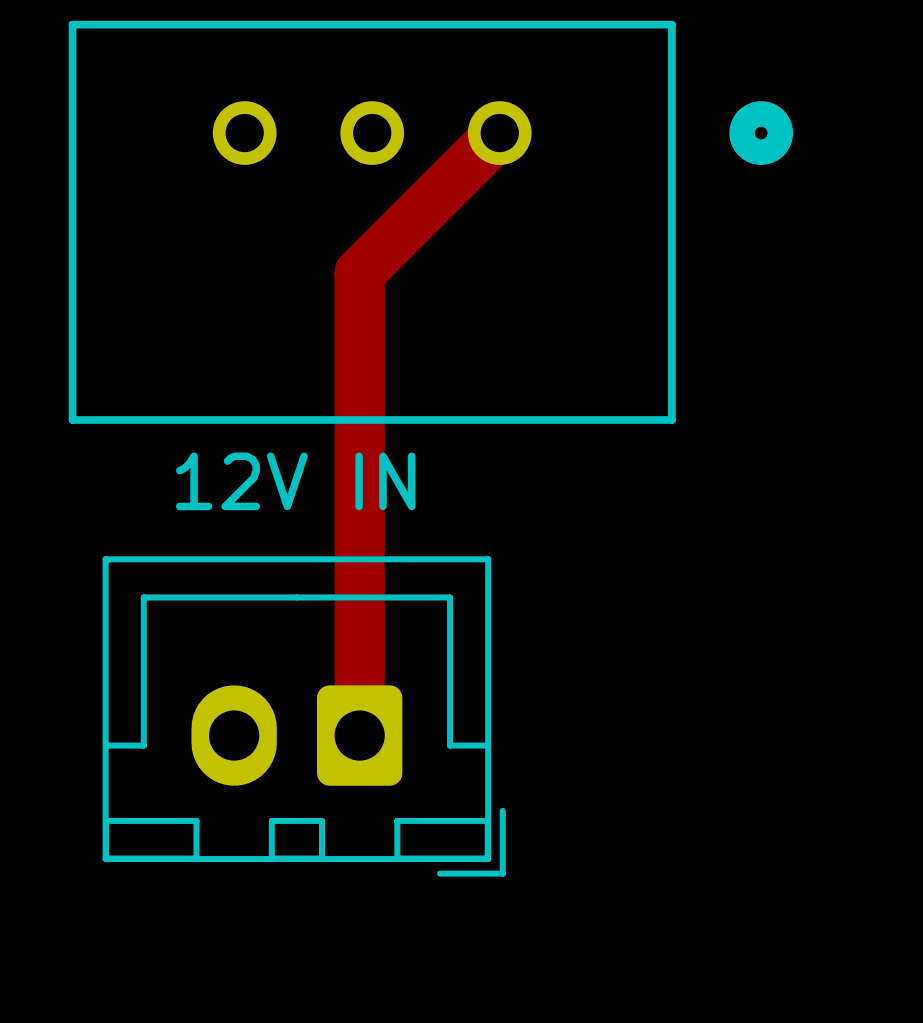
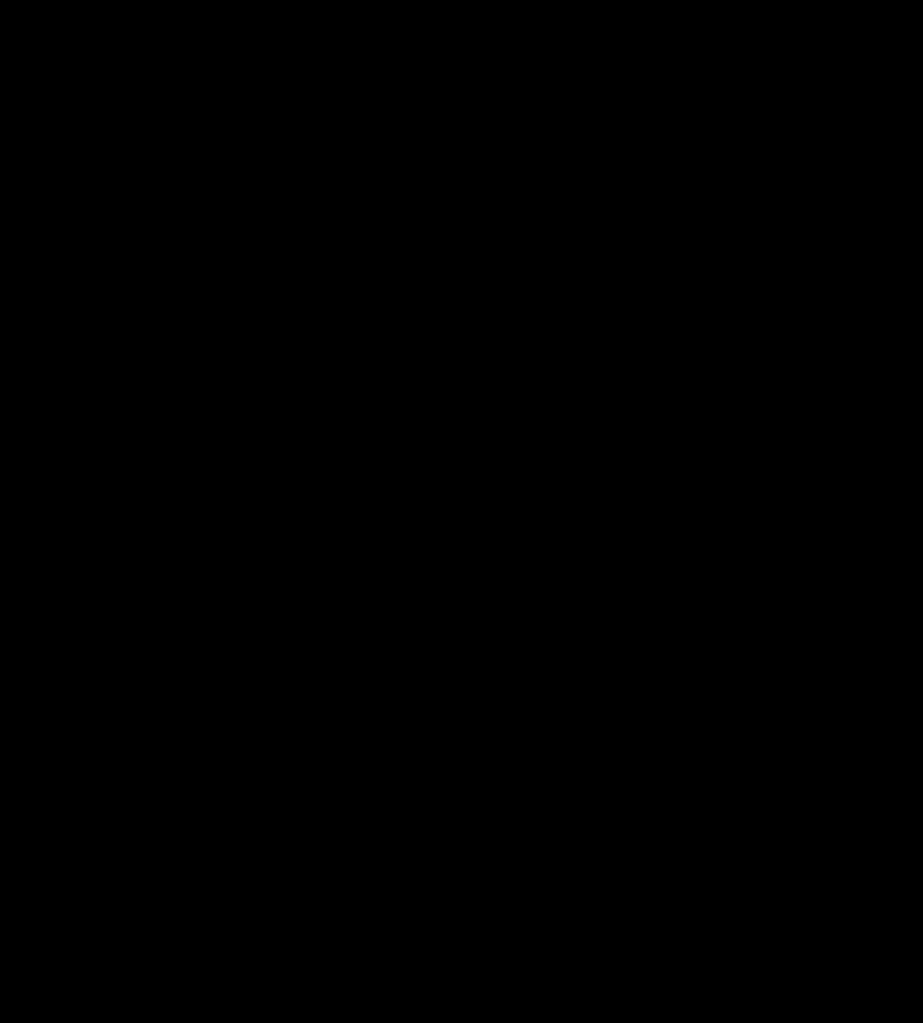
top track: (499, 133) (359, 273) (359, 735) -> none
part: (430, 222) -> none
part: 12V IN (304, 716) -> none

